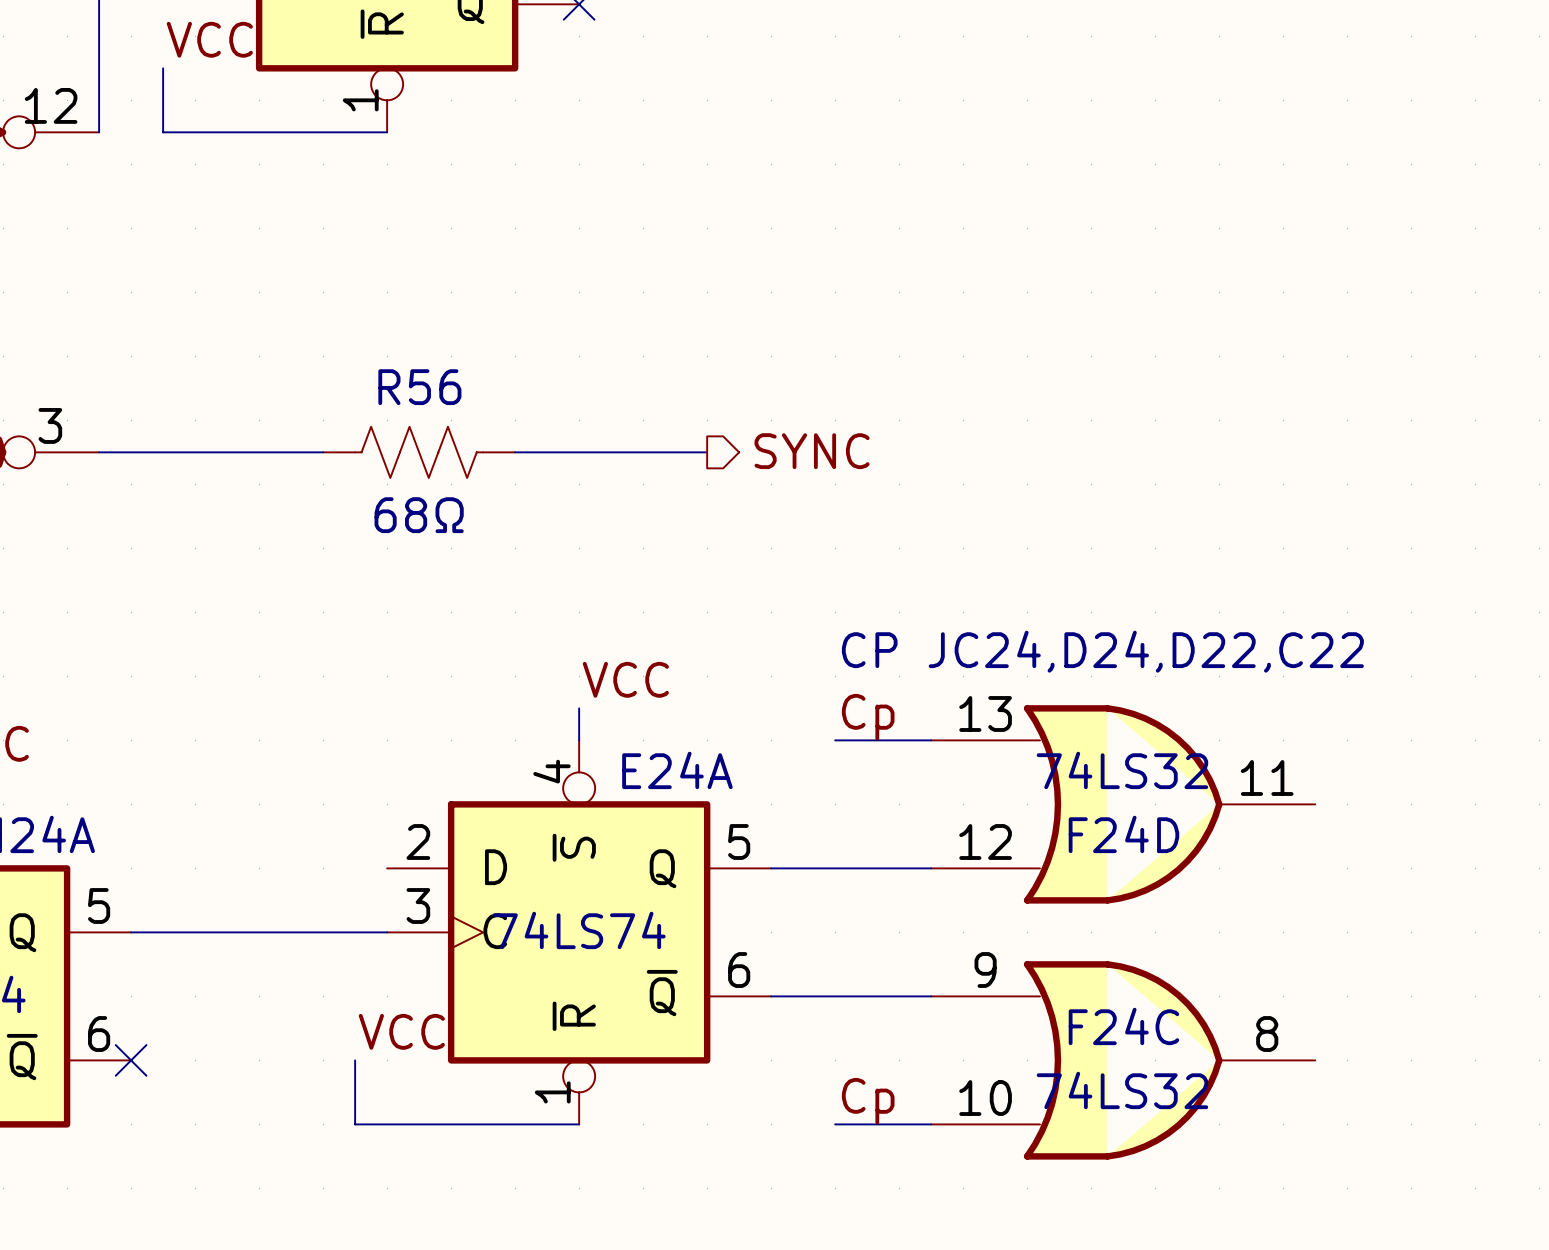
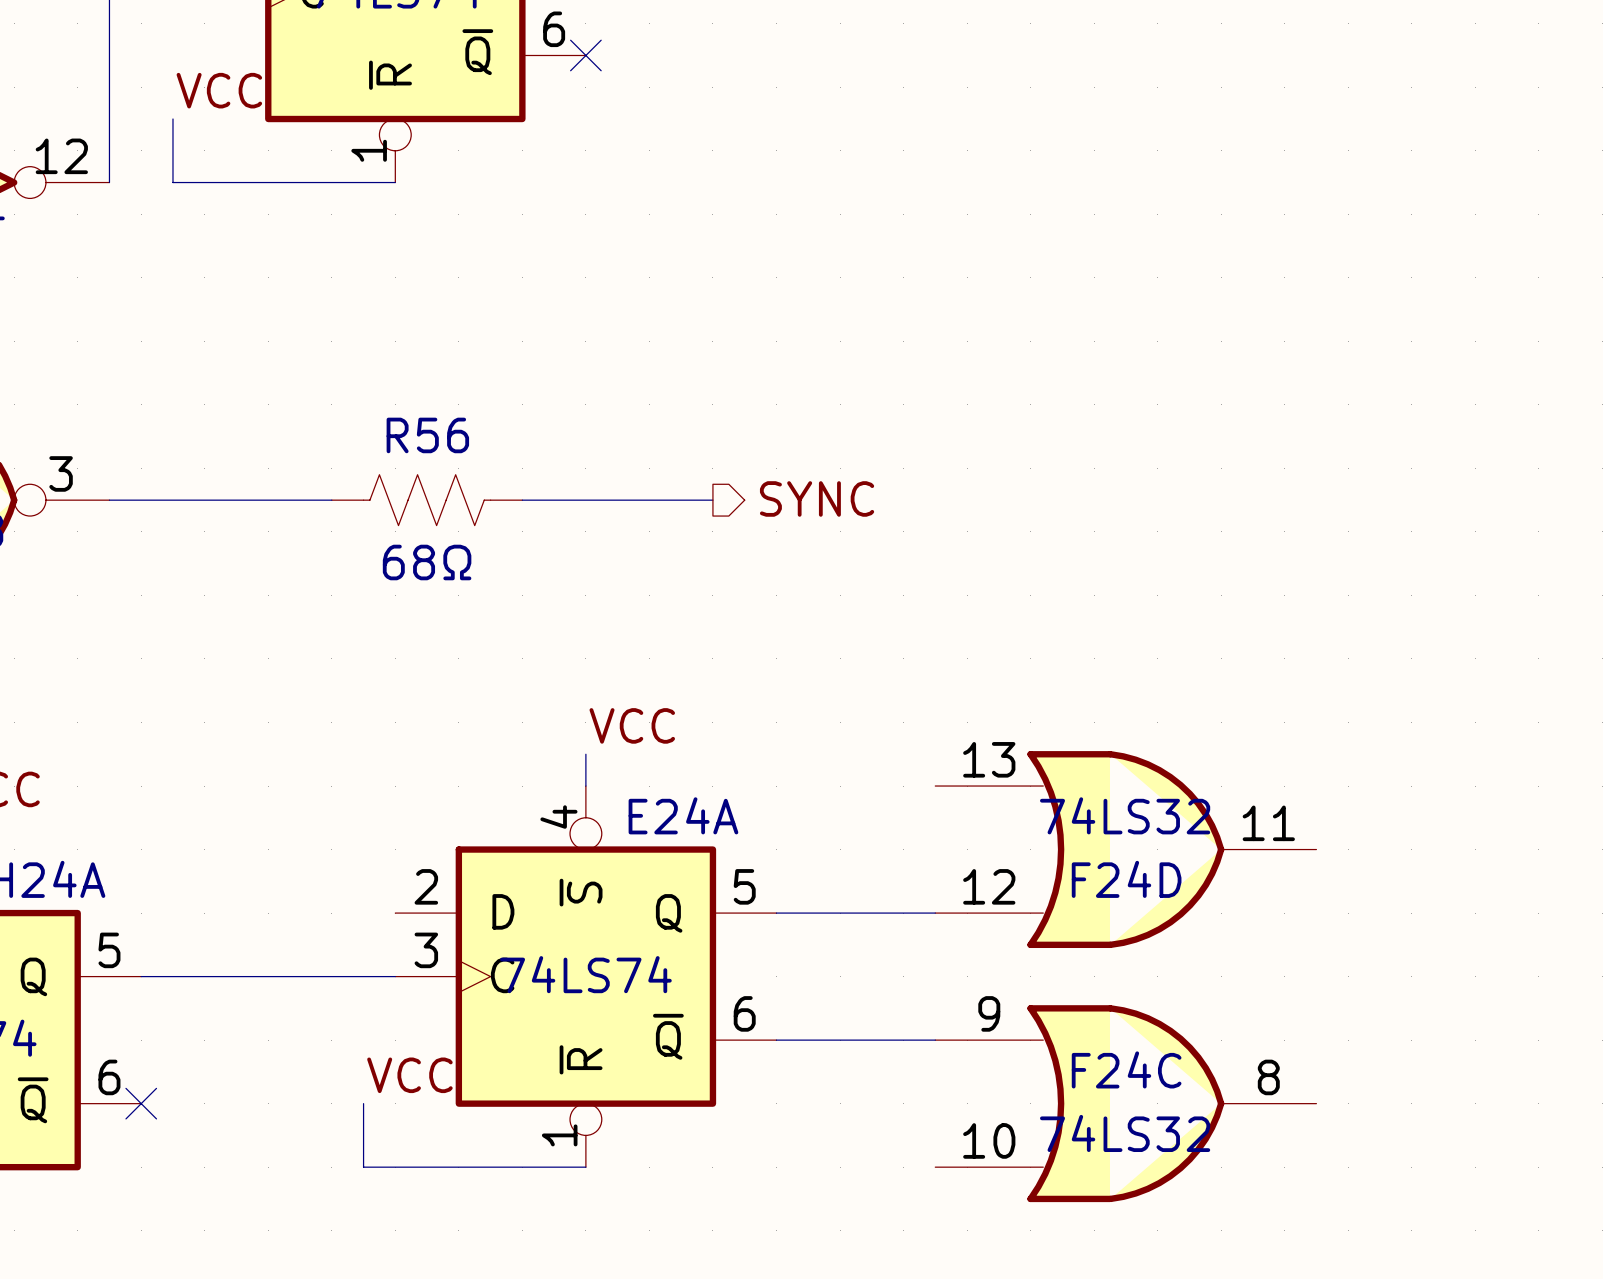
text: CP JC24,D24,D22,C22 (1102, 651) -> none
label: Cp (868, 717) -> none
wire: (835, 740) (931, 740) -> none
label: Cp (868, 1101) -> none
wire: (835, 1124) (931, 1124) -> none

